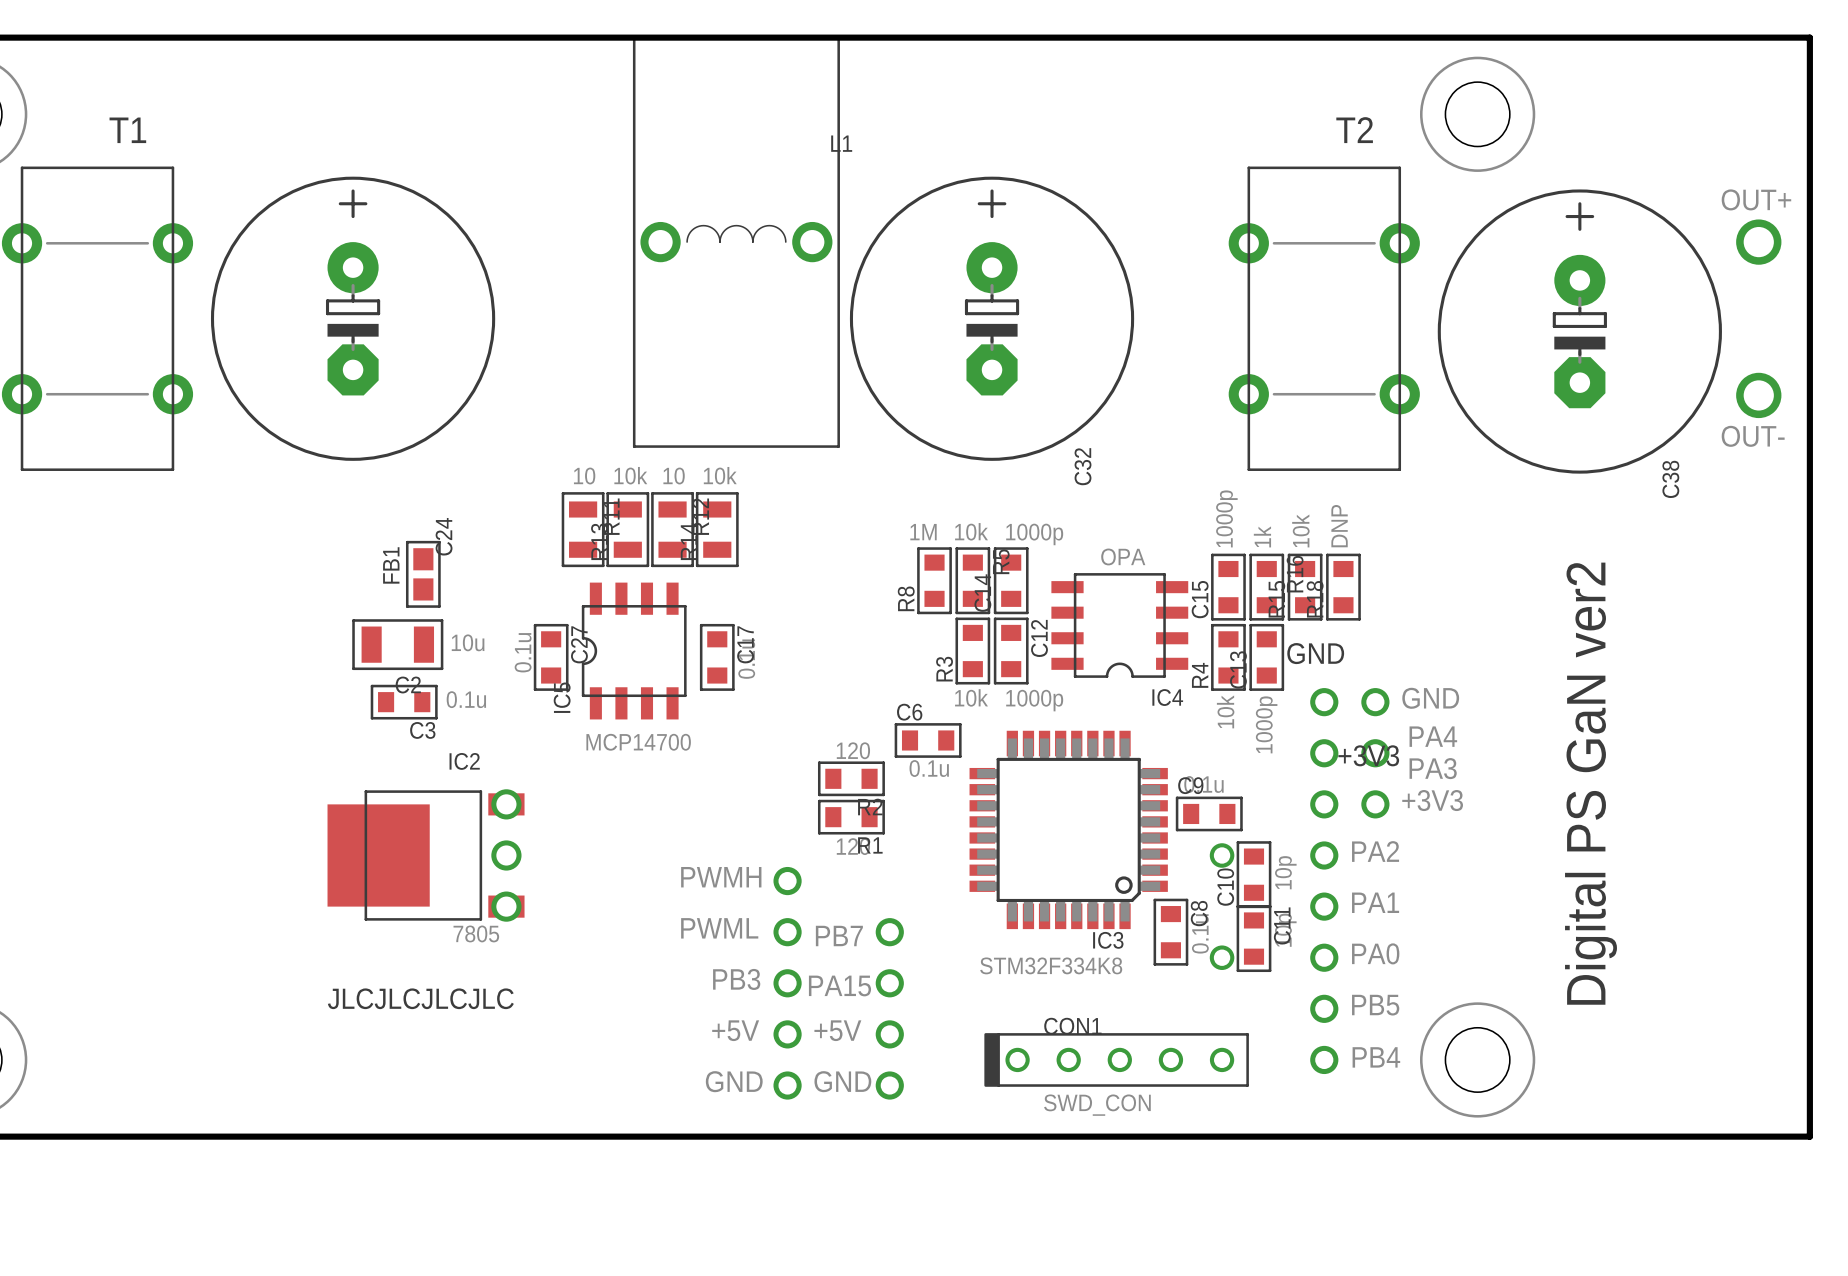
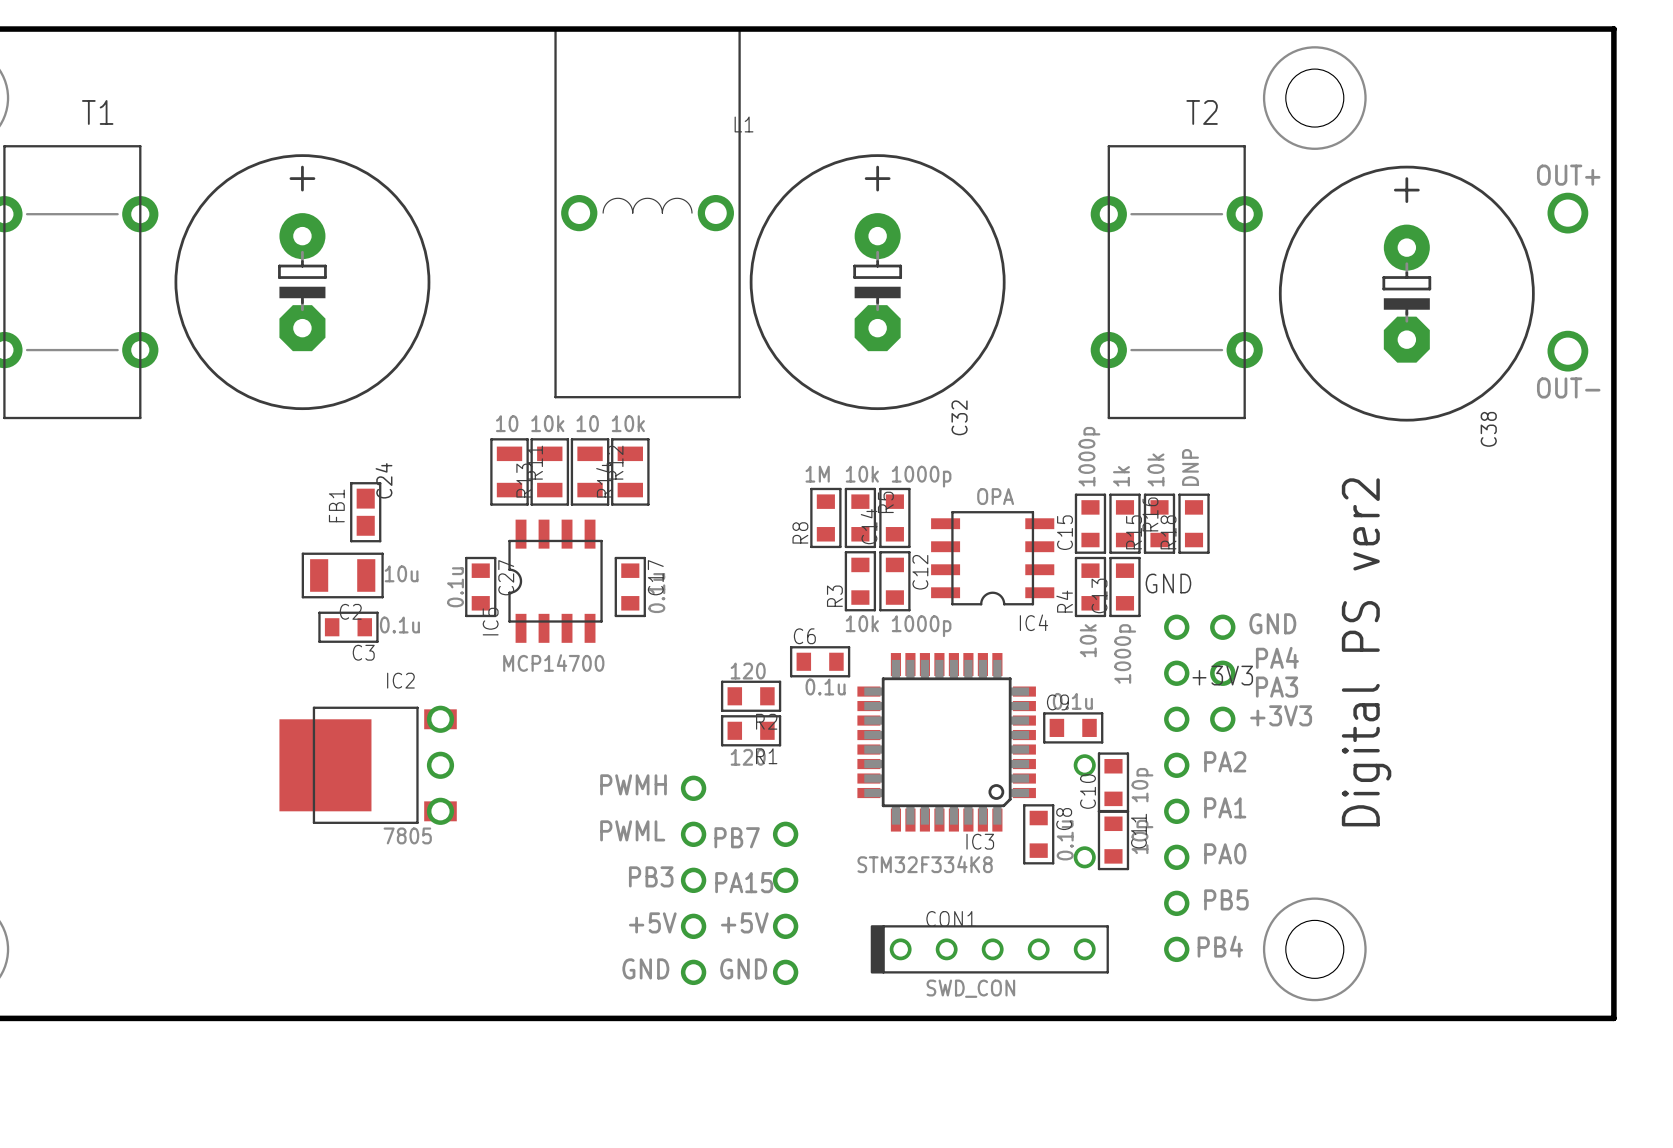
text: Digital PS GaN ver2 (1591, 783) -> Digital PS ver2 (1366, 652)
text: JLCJLCJLCJLC (420, 998) -> none

